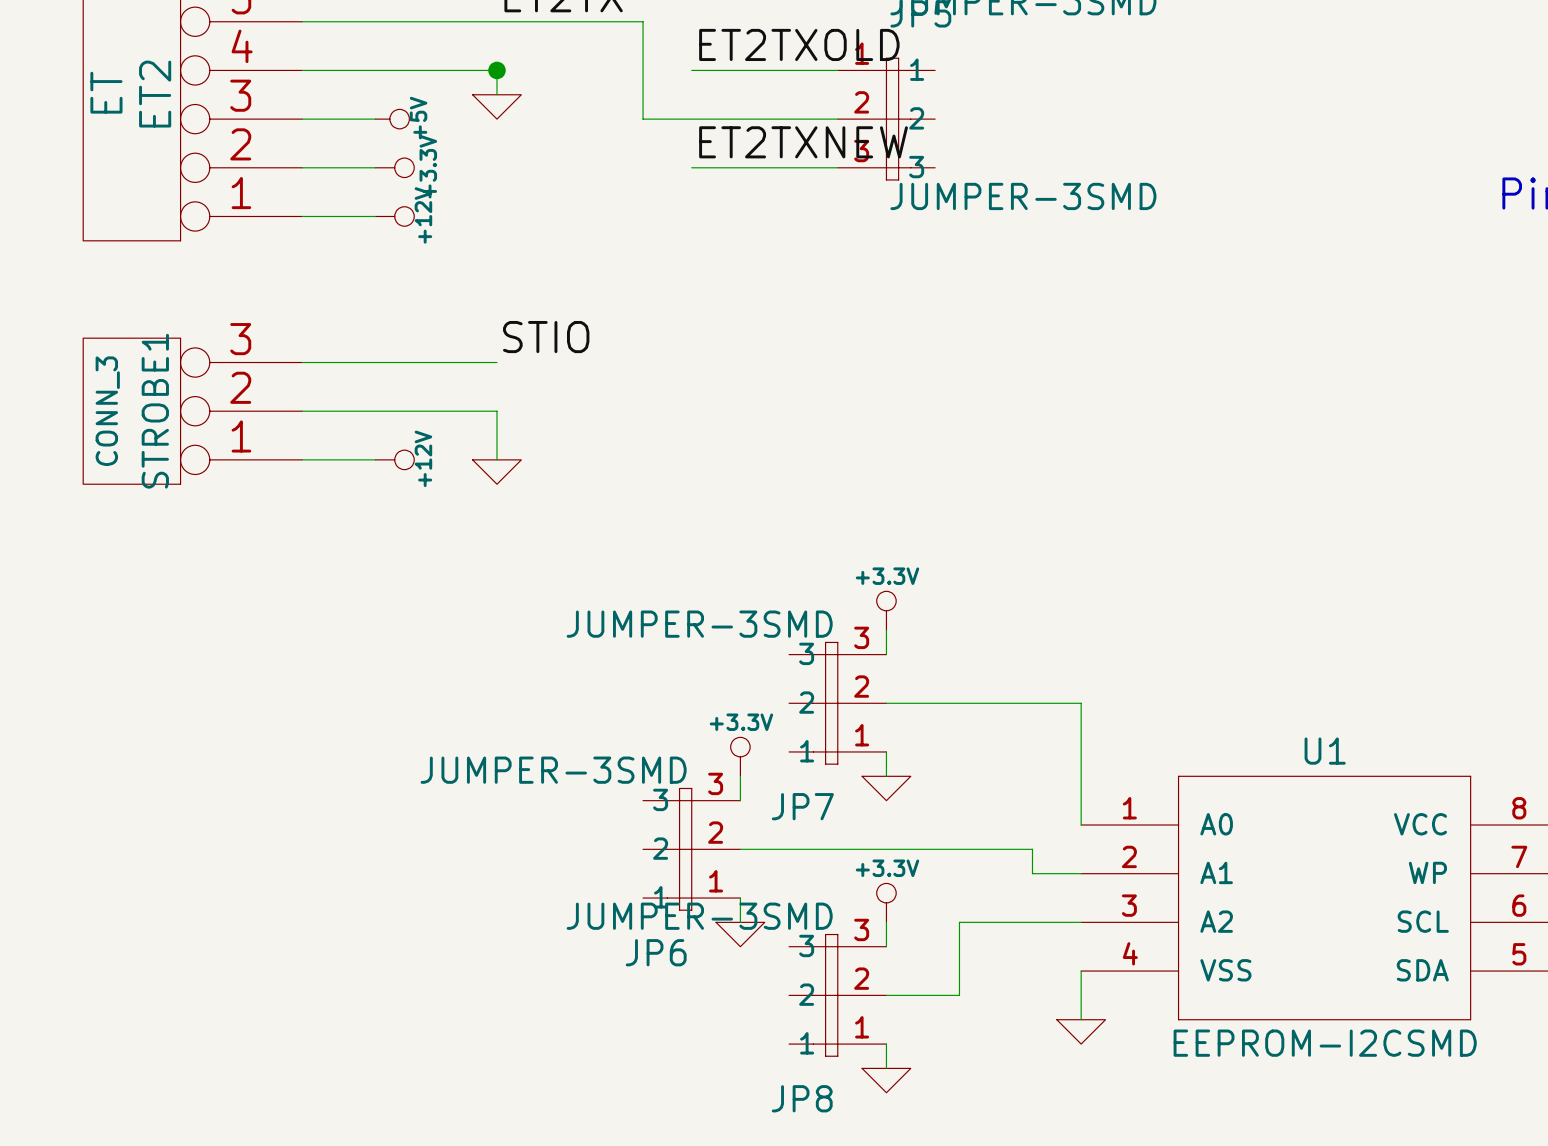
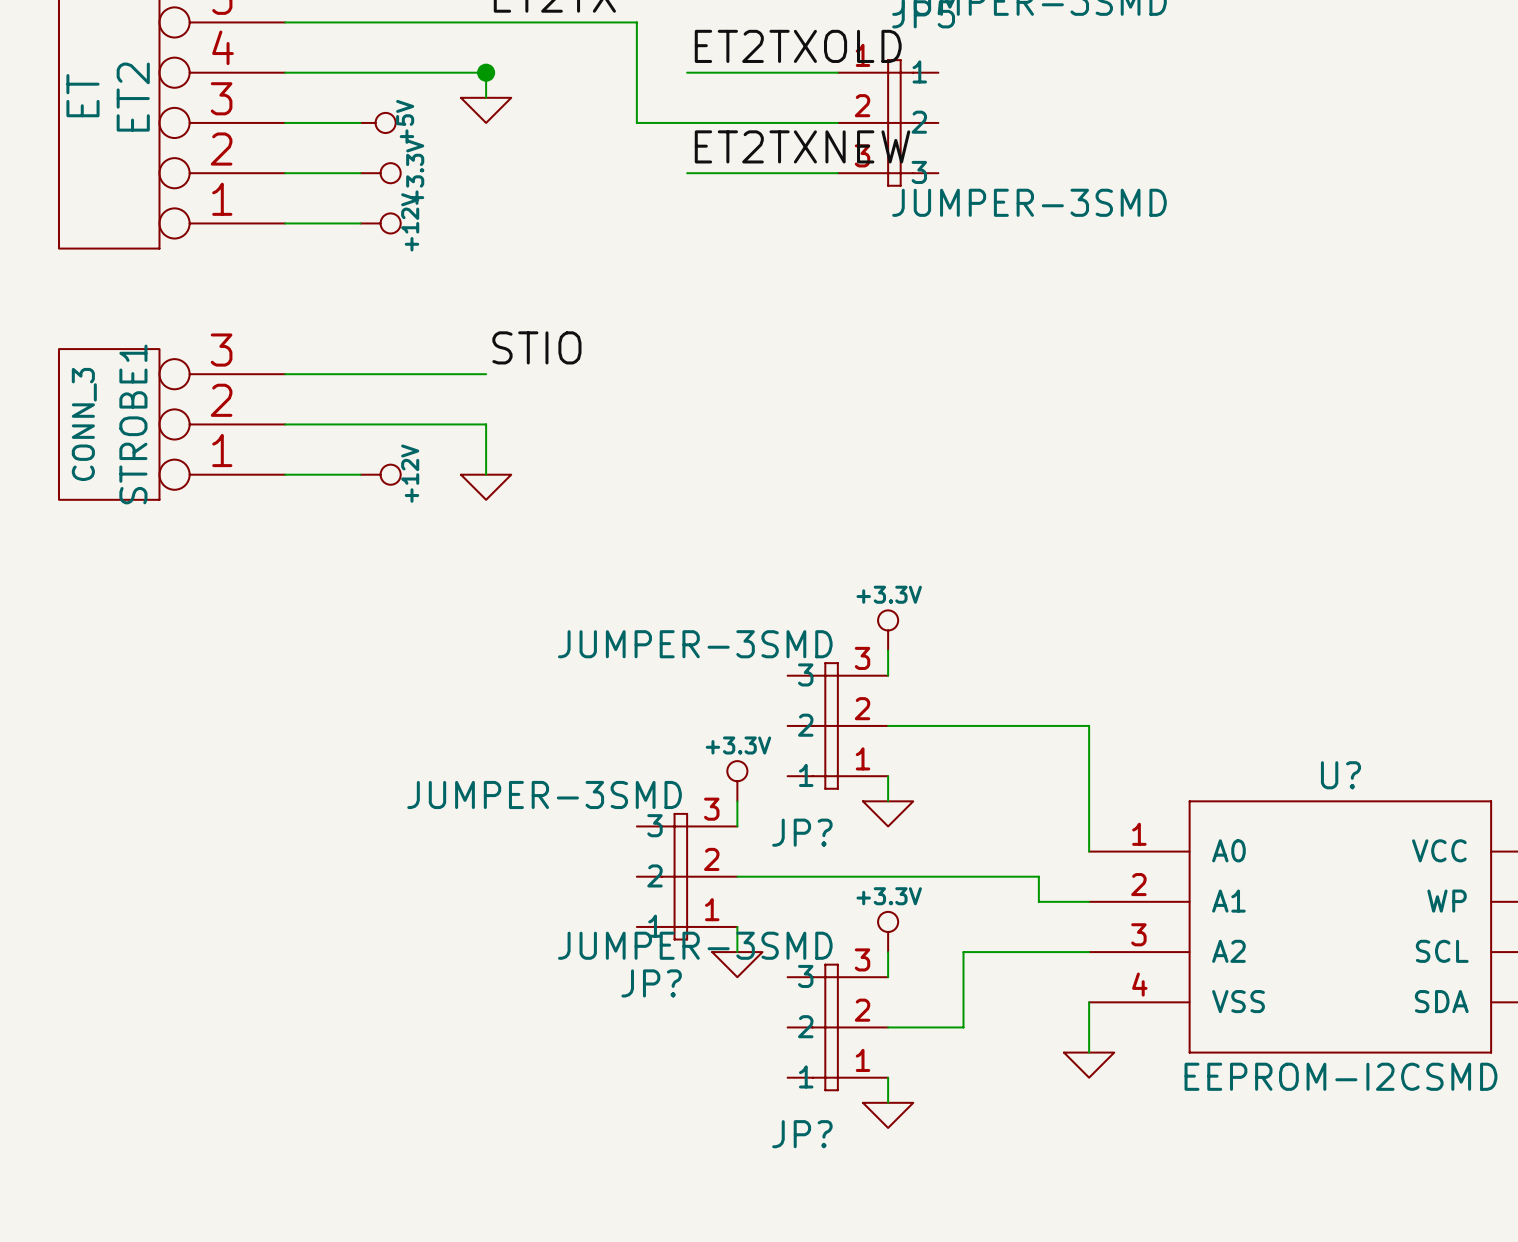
U1 name: U1 (1325, 751) -> U? (1340, 775)
JP7 name: JP7 (802, 806) -> JP? (802, 832)
JP6 name: JP6 (656, 952) -> JP? (651, 983)
JP8 name: JP8 (802, 1098) -> JP? (802, 1134)

